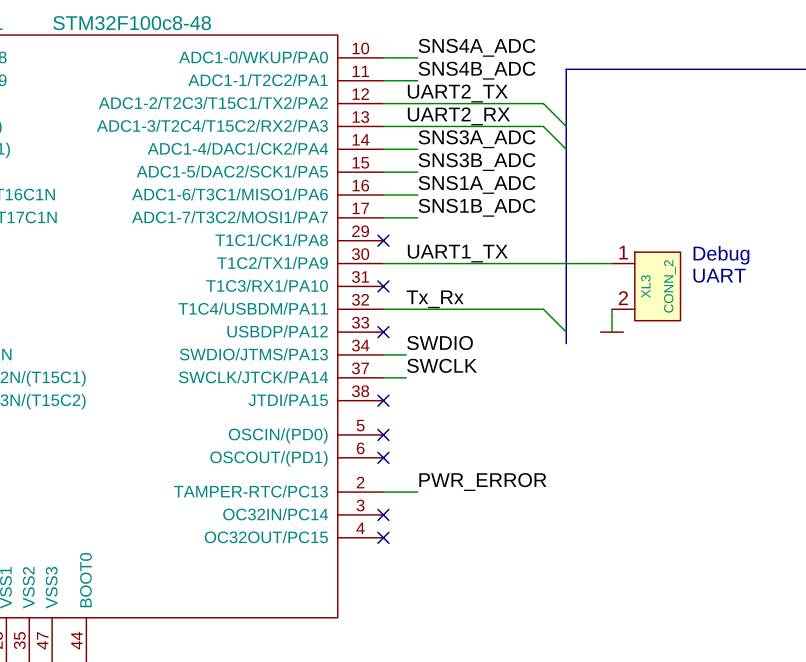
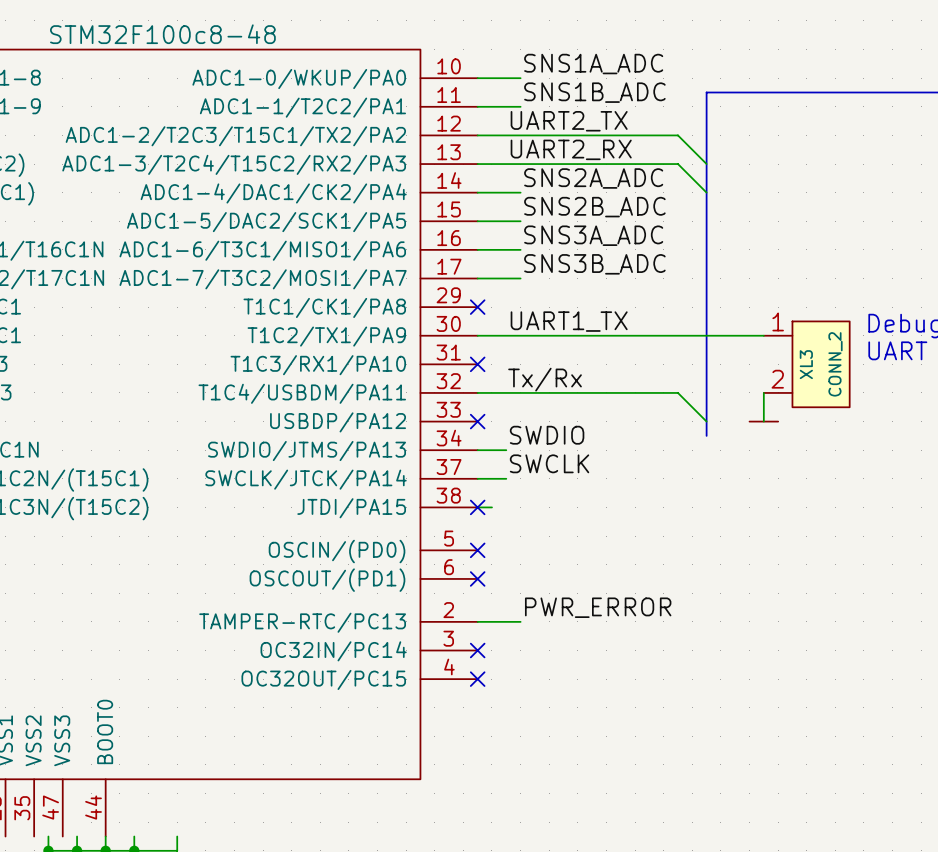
label: SNS4A_ADC (477, 47) -> SNS1A_ADC (593, 64)
label: SNS4B_ADC (477, 70) -> SNS1B_ADC (594, 92)
label: SNS3A_ADC (477, 139) -> SNS2A_ADC (593, 178)
label: SNS3B_ADC (477, 162) -> SNS2B_ADC (594, 207)
label: SNS1A_ADC (477, 184) -> SNS3A_ADC (593, 235)
label: SNS1B_ADC (477, 207) -> SNS3B_ADC (594, 264)
label: Tx_Rx (435, 299) -> Tx/Rx (545, 379)
wire: none -> (477, 507) (491, 507)

